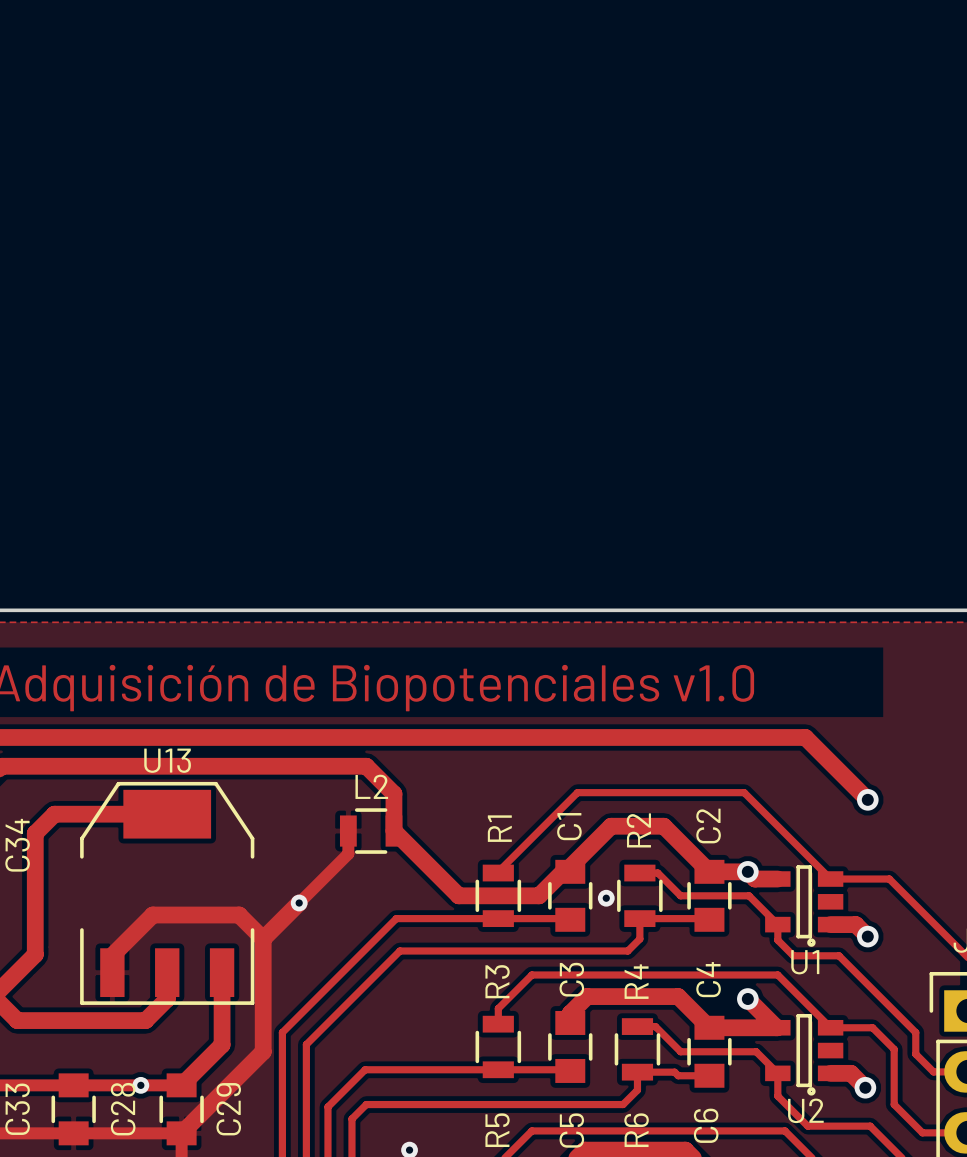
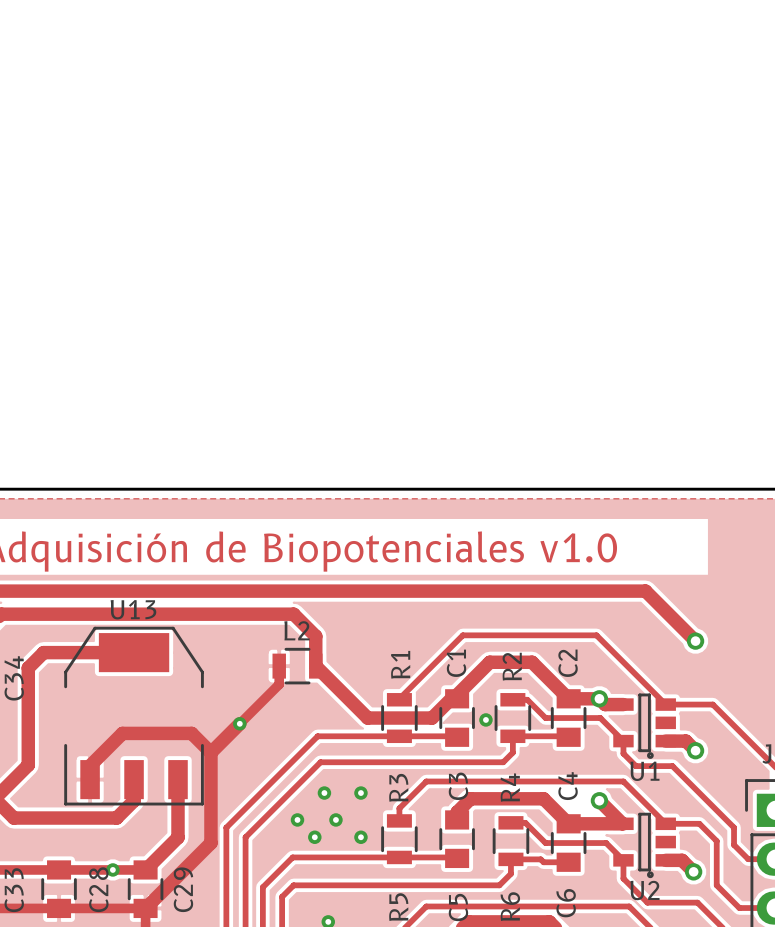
via: none -> (324, 793)
via: none -> (360, 793)
via: none -> (297, 819)
via: none -> (335, 819)
via: none -> (314, 837)
via: none -> (360, 837)

